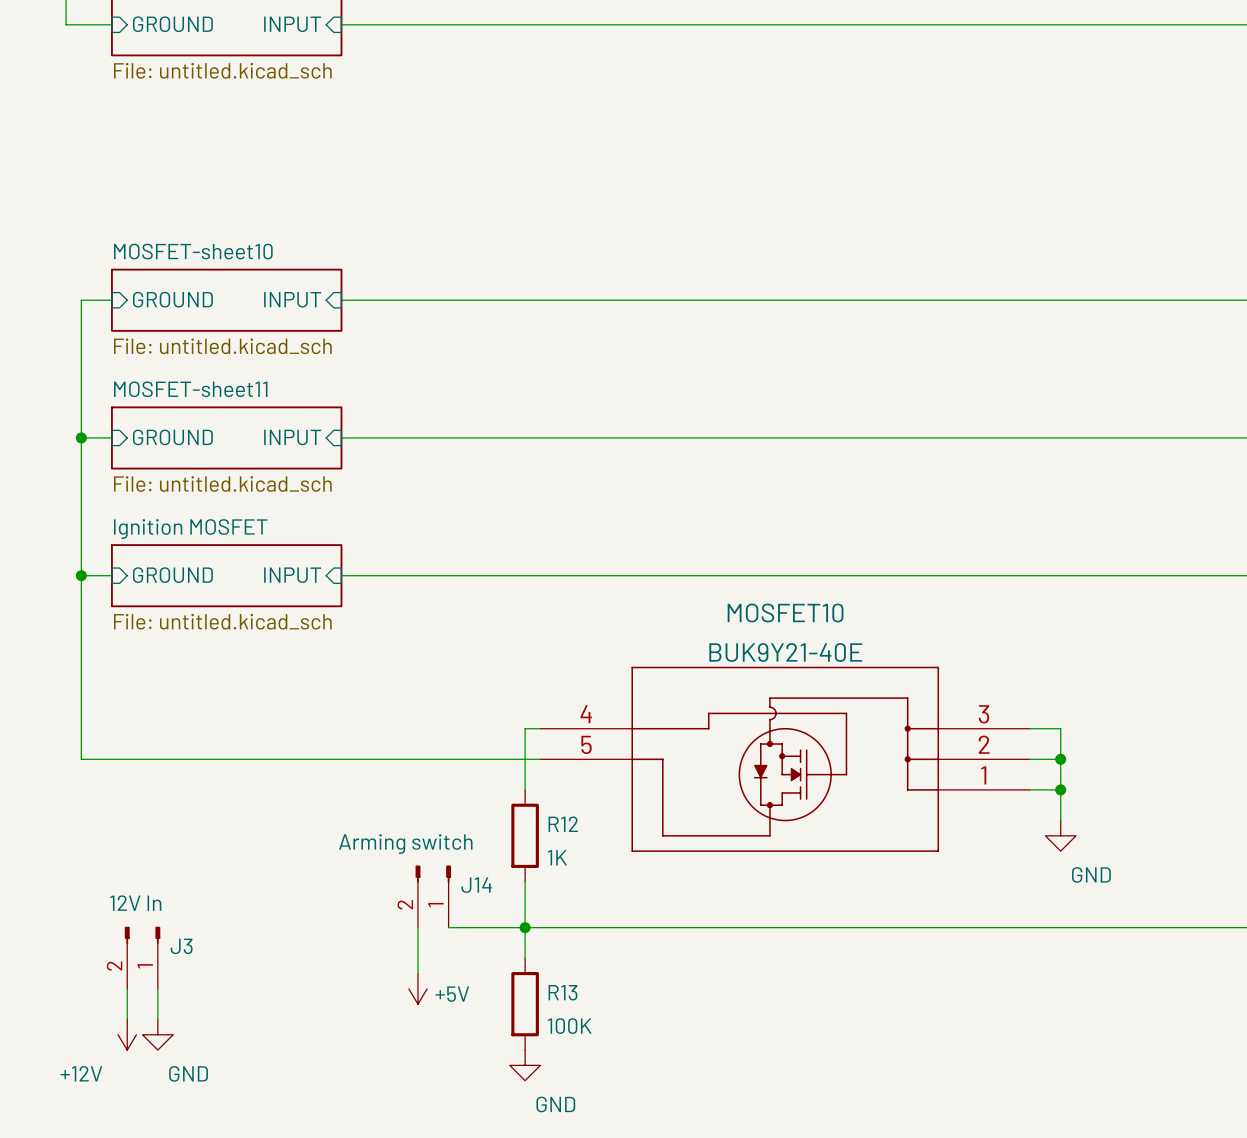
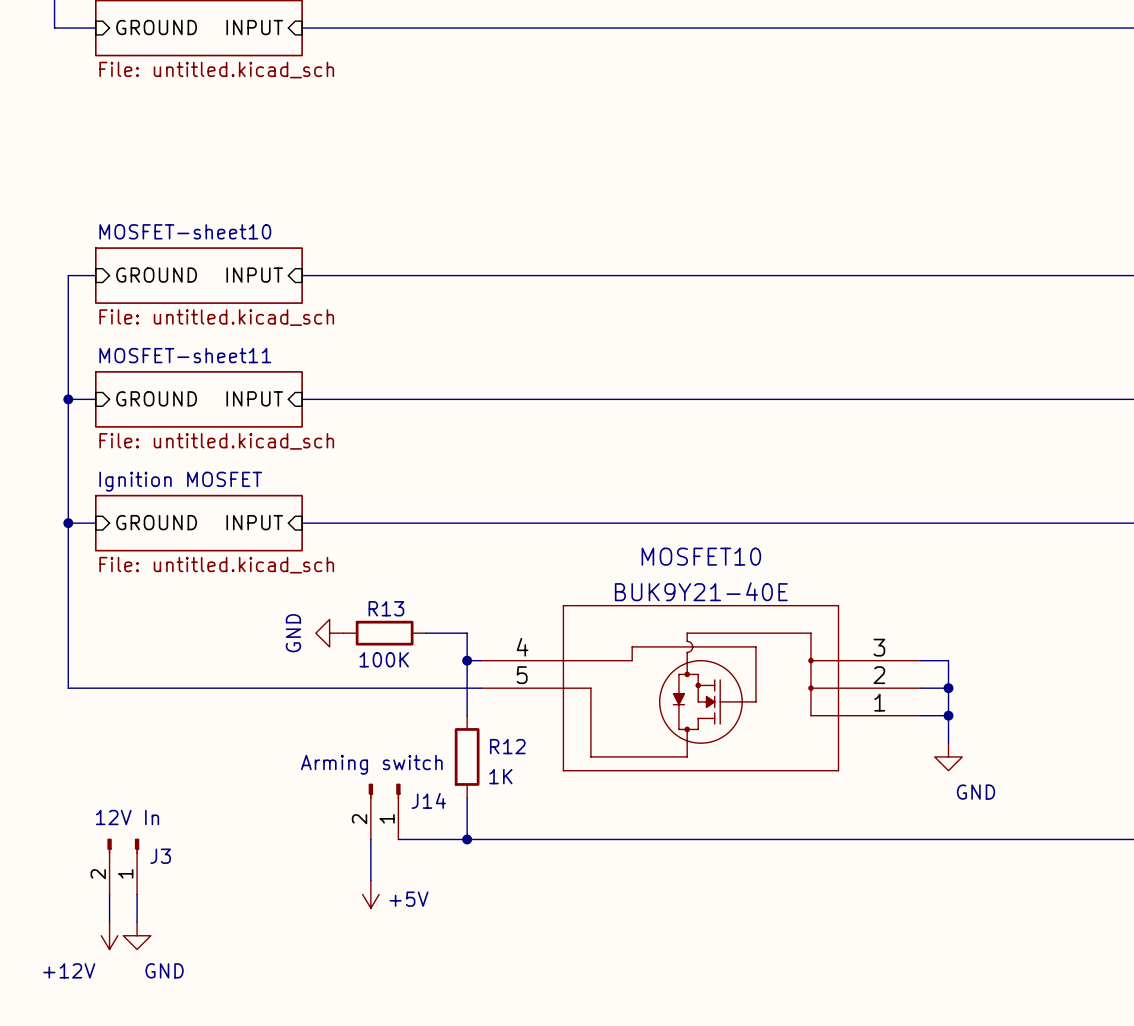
power symbol: none -> GND (329, 633)
wire: none -> (425, 633) (467, 633) (467, 660)
junction: none -> (467, 660)
wire: (525, 927) (525, 958) -> none
R13 name position: R13 (562, 992) -> R13 (386, 608)
R13 rotation: 0° (525, 1004) -> 90° clockwise (384, 633)
R13 position: (525, 1004) -> (384, 633)
R13 value position: 100K (569, 1026) -> 100K (384, 659)
power symbol: GND (525, 1065) -> none

